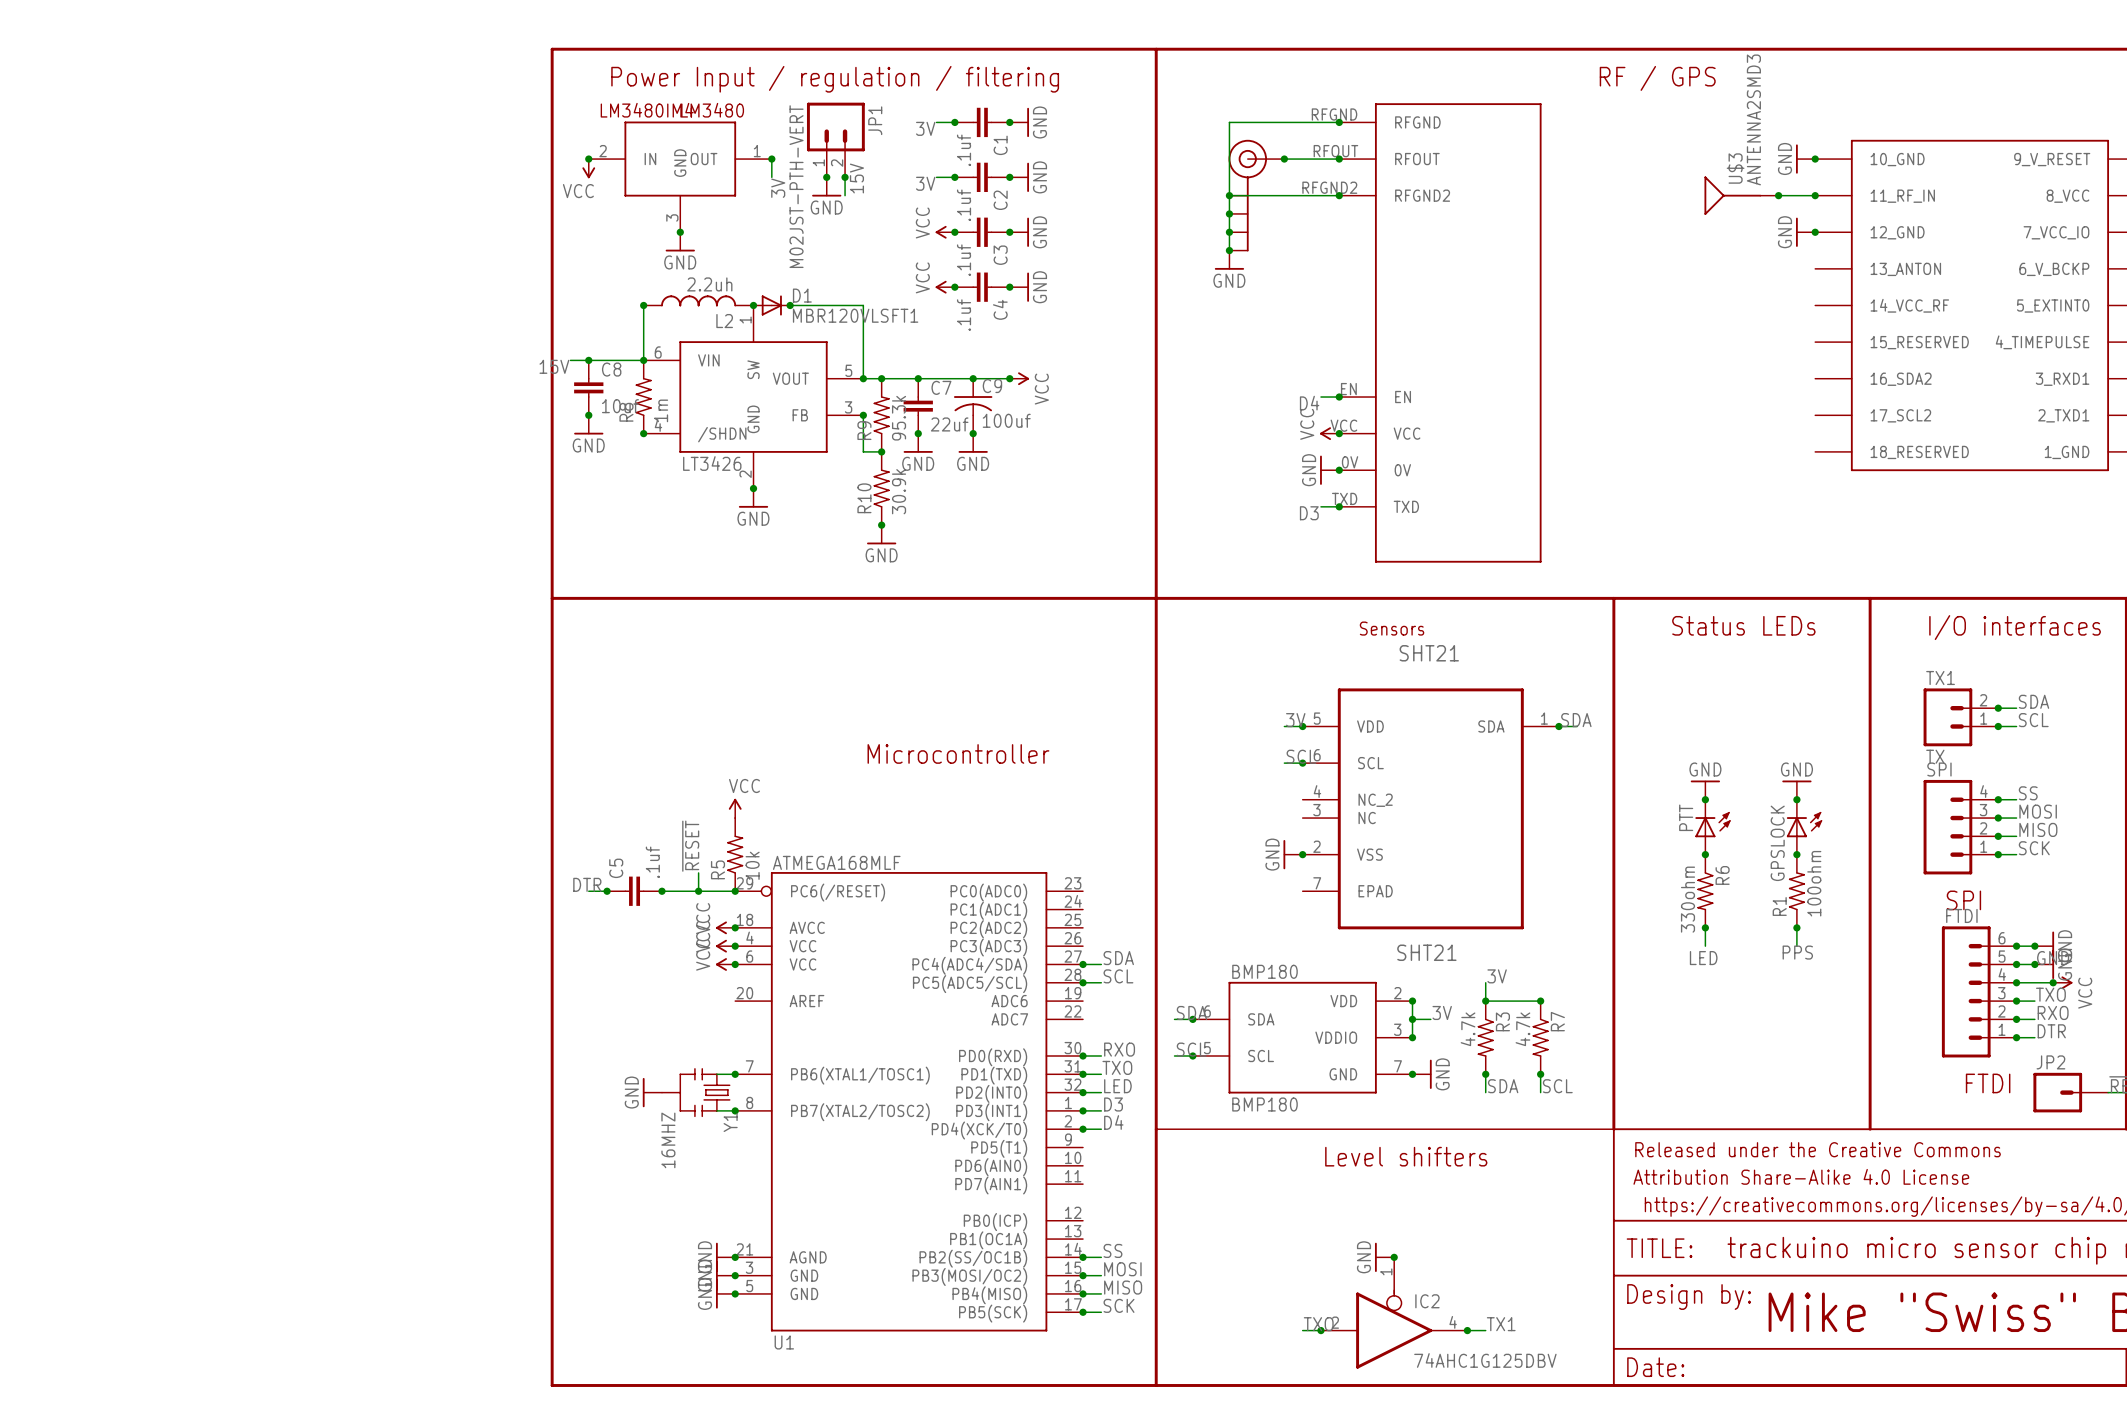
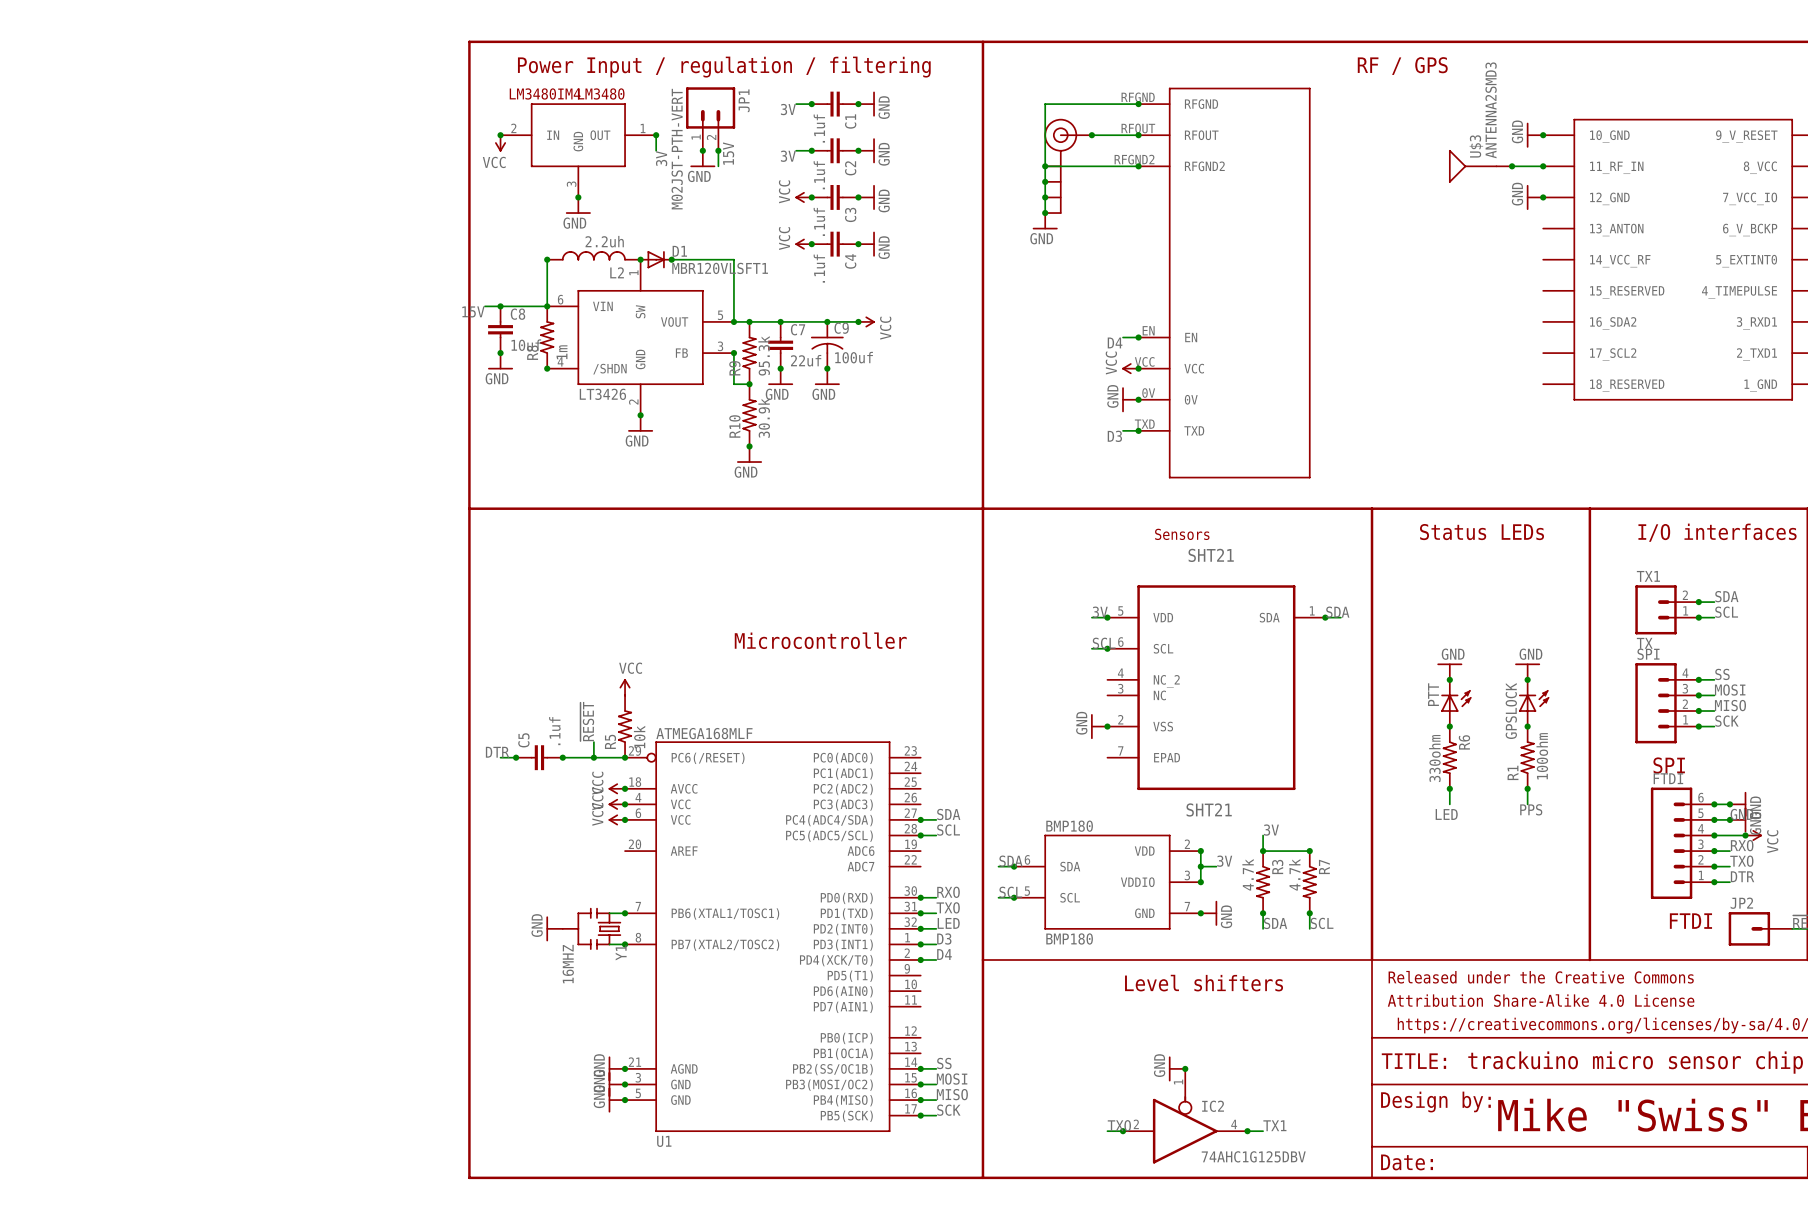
label: TXO (2050, 994) -> RXO (1742, 845)
label: RXO (2053, 1012) -> TXO (1741, 861)

